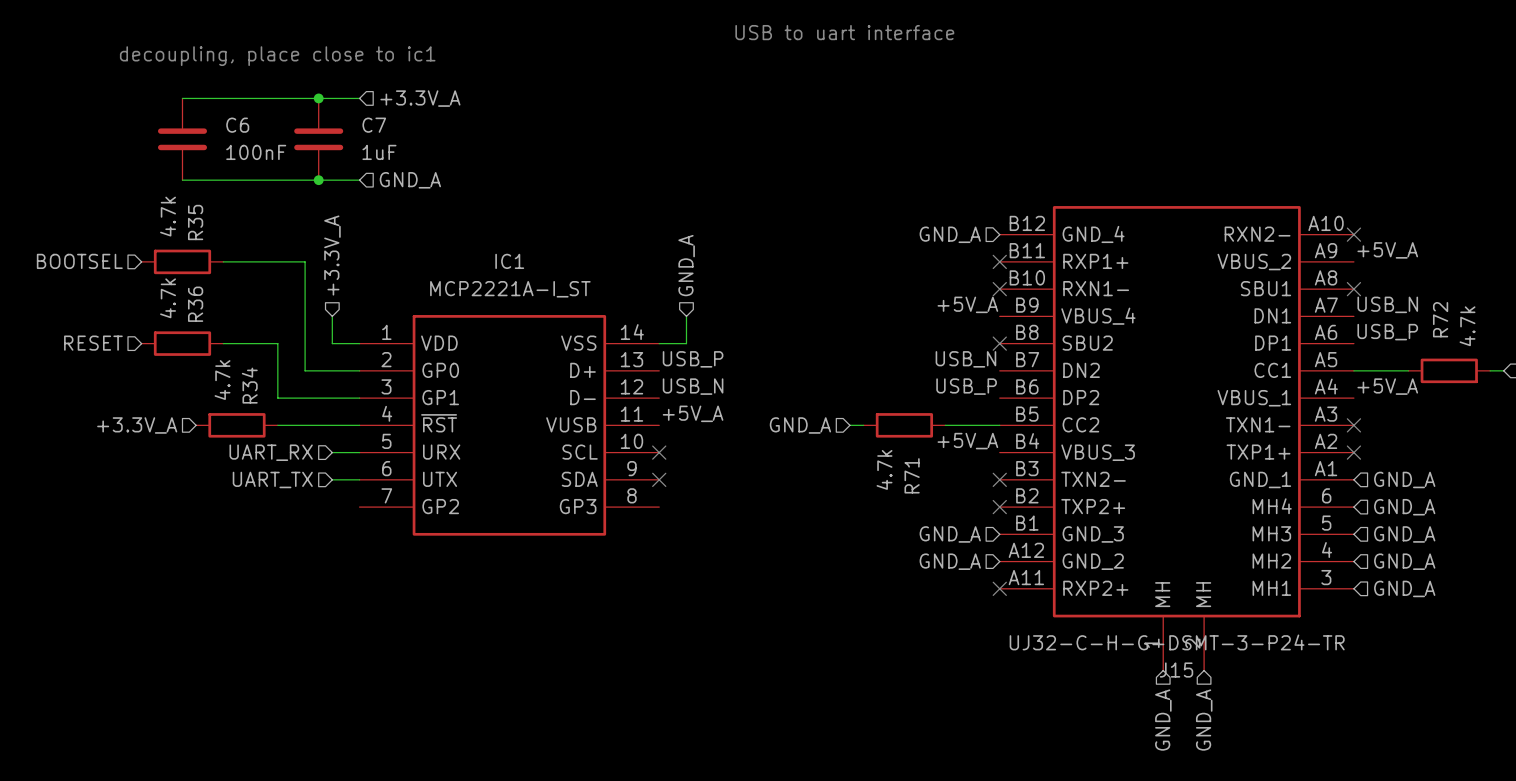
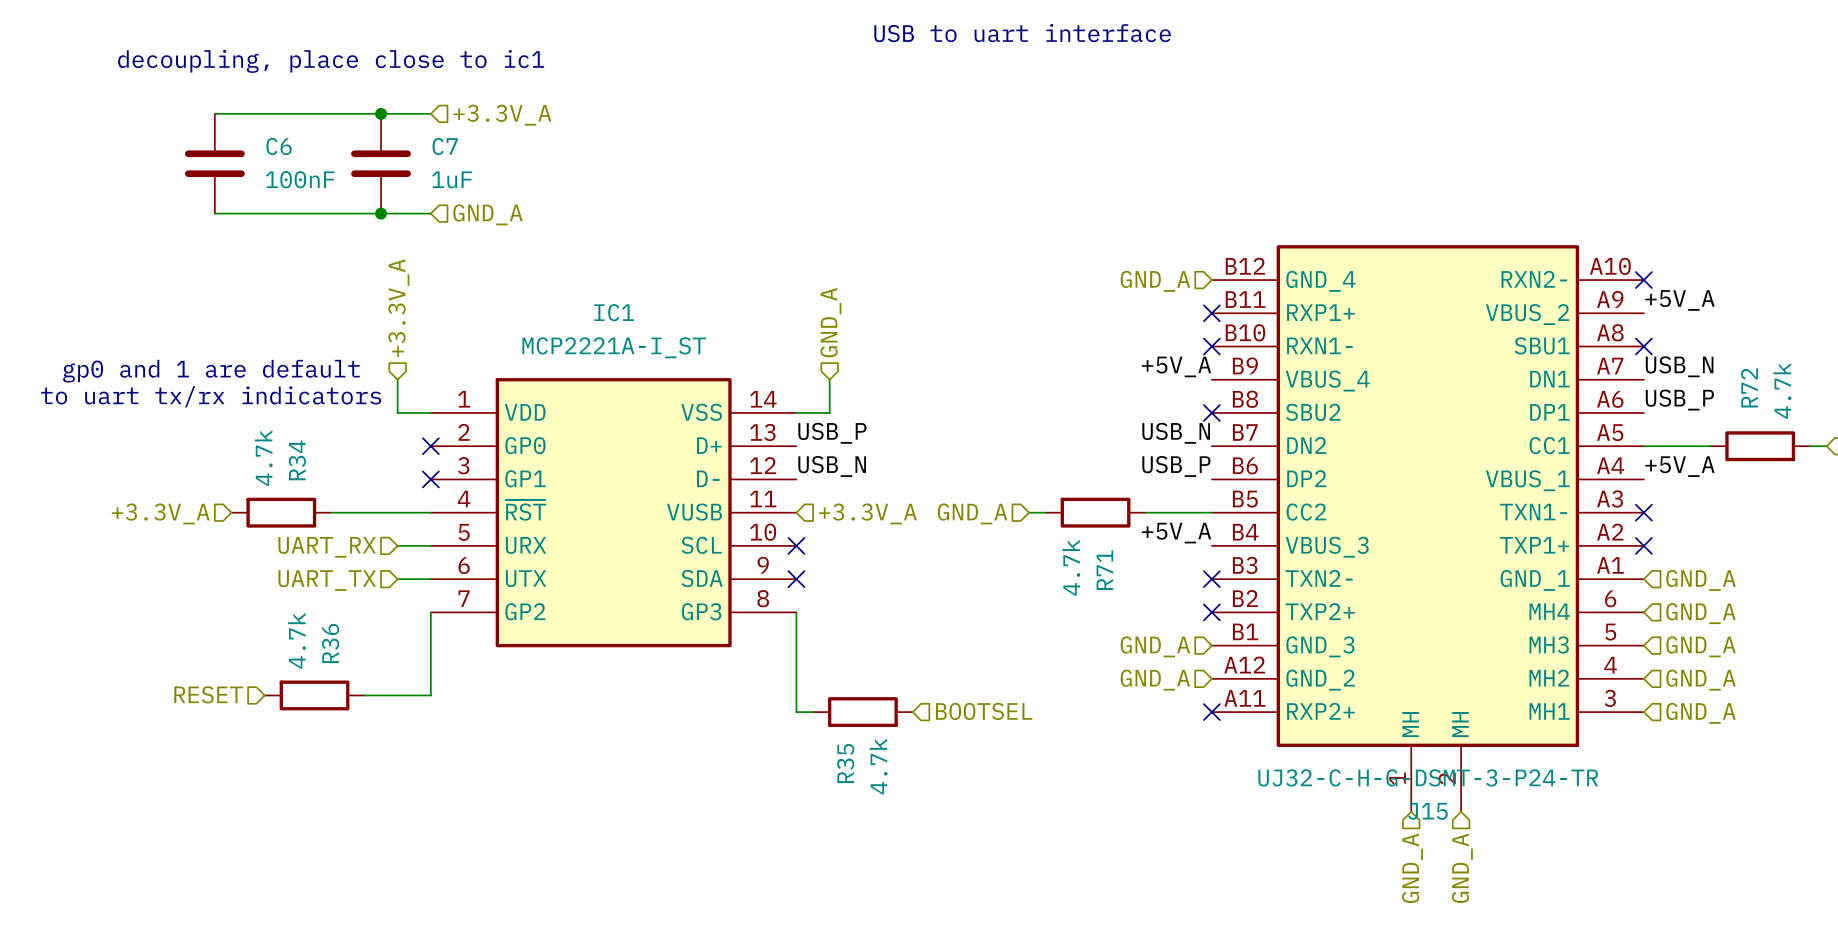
R35 value position: 4.7k (168, 216) -> 4.7k (878, 766)
R35 name position: R35 (195, 222) -> R35 (845, 763)
hierarchical label: BOOTSEL (79, 261) -> none
R35 position: (182, 261) -> (862, 712)
wire: (223, 261) (305, 261) (305, 370) (359, 370) -> none
text: none -> gp0 and 1 are default (211, 371)
text: none -> to uart tx/rx indicators (211, 396)
hierarchical label position: RESET (93, 343) -> RESET (208, 694)
R36 position: (182, 343) -> (314, 695)
wire: (223, 343) (277, 343) (277, 398) (359, 398) -> none
no-connect mark: none -> (430, 446)
no-connect mark: none -> (430, 479)
label: +5V_A (693, 413) -> none
hierarchical label: none -> +3.3V_A (867, 513)
wire: none -> (430, 612) (430, 695) (364, 695)
wire: none -> (796, 612) (796, 712) (813, 712)
hierarchical label: none -> BOOTSEL (984, 711)

